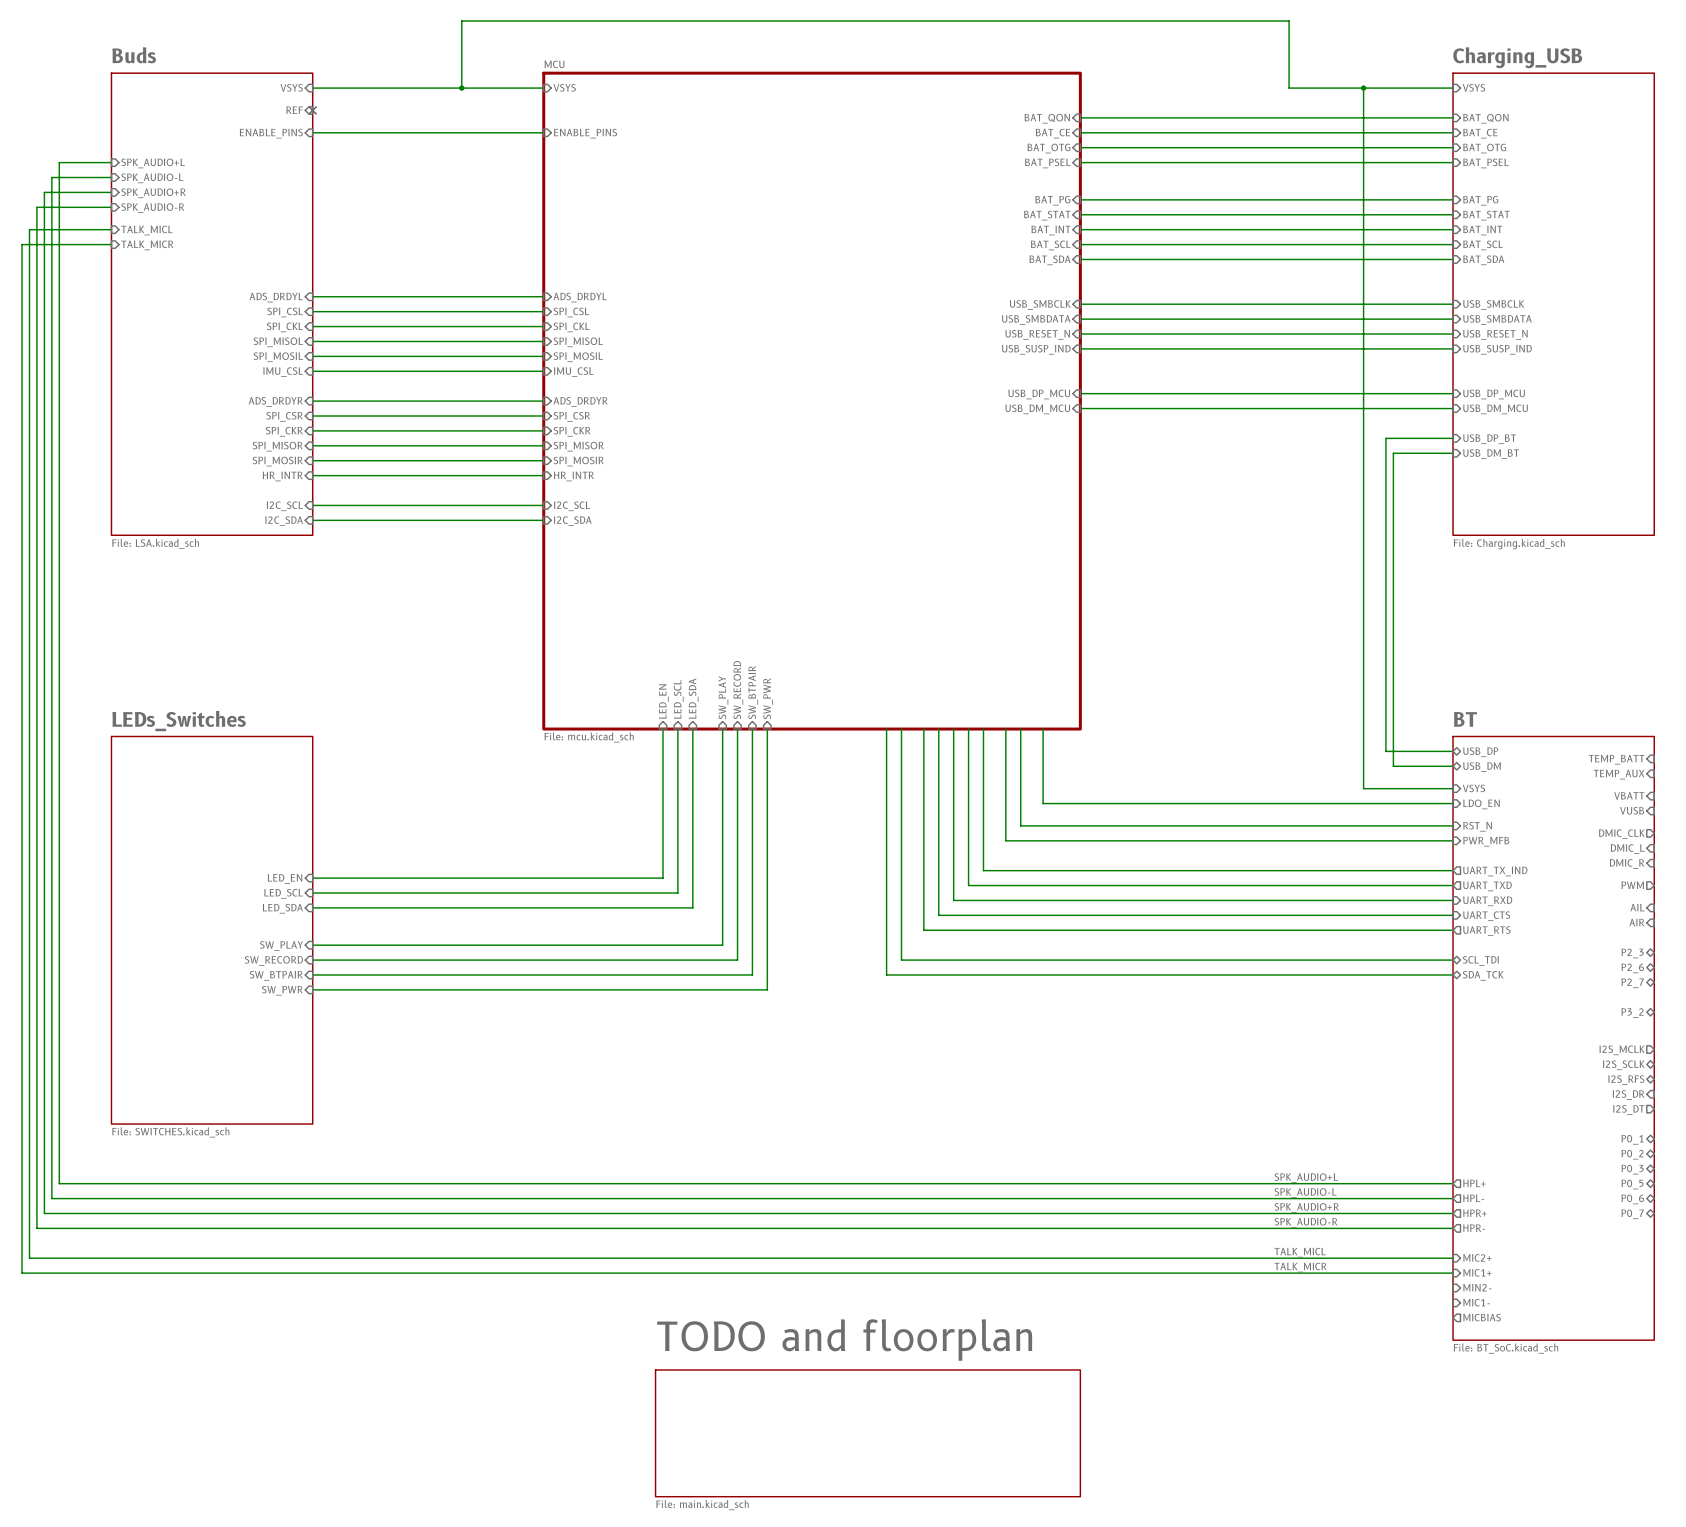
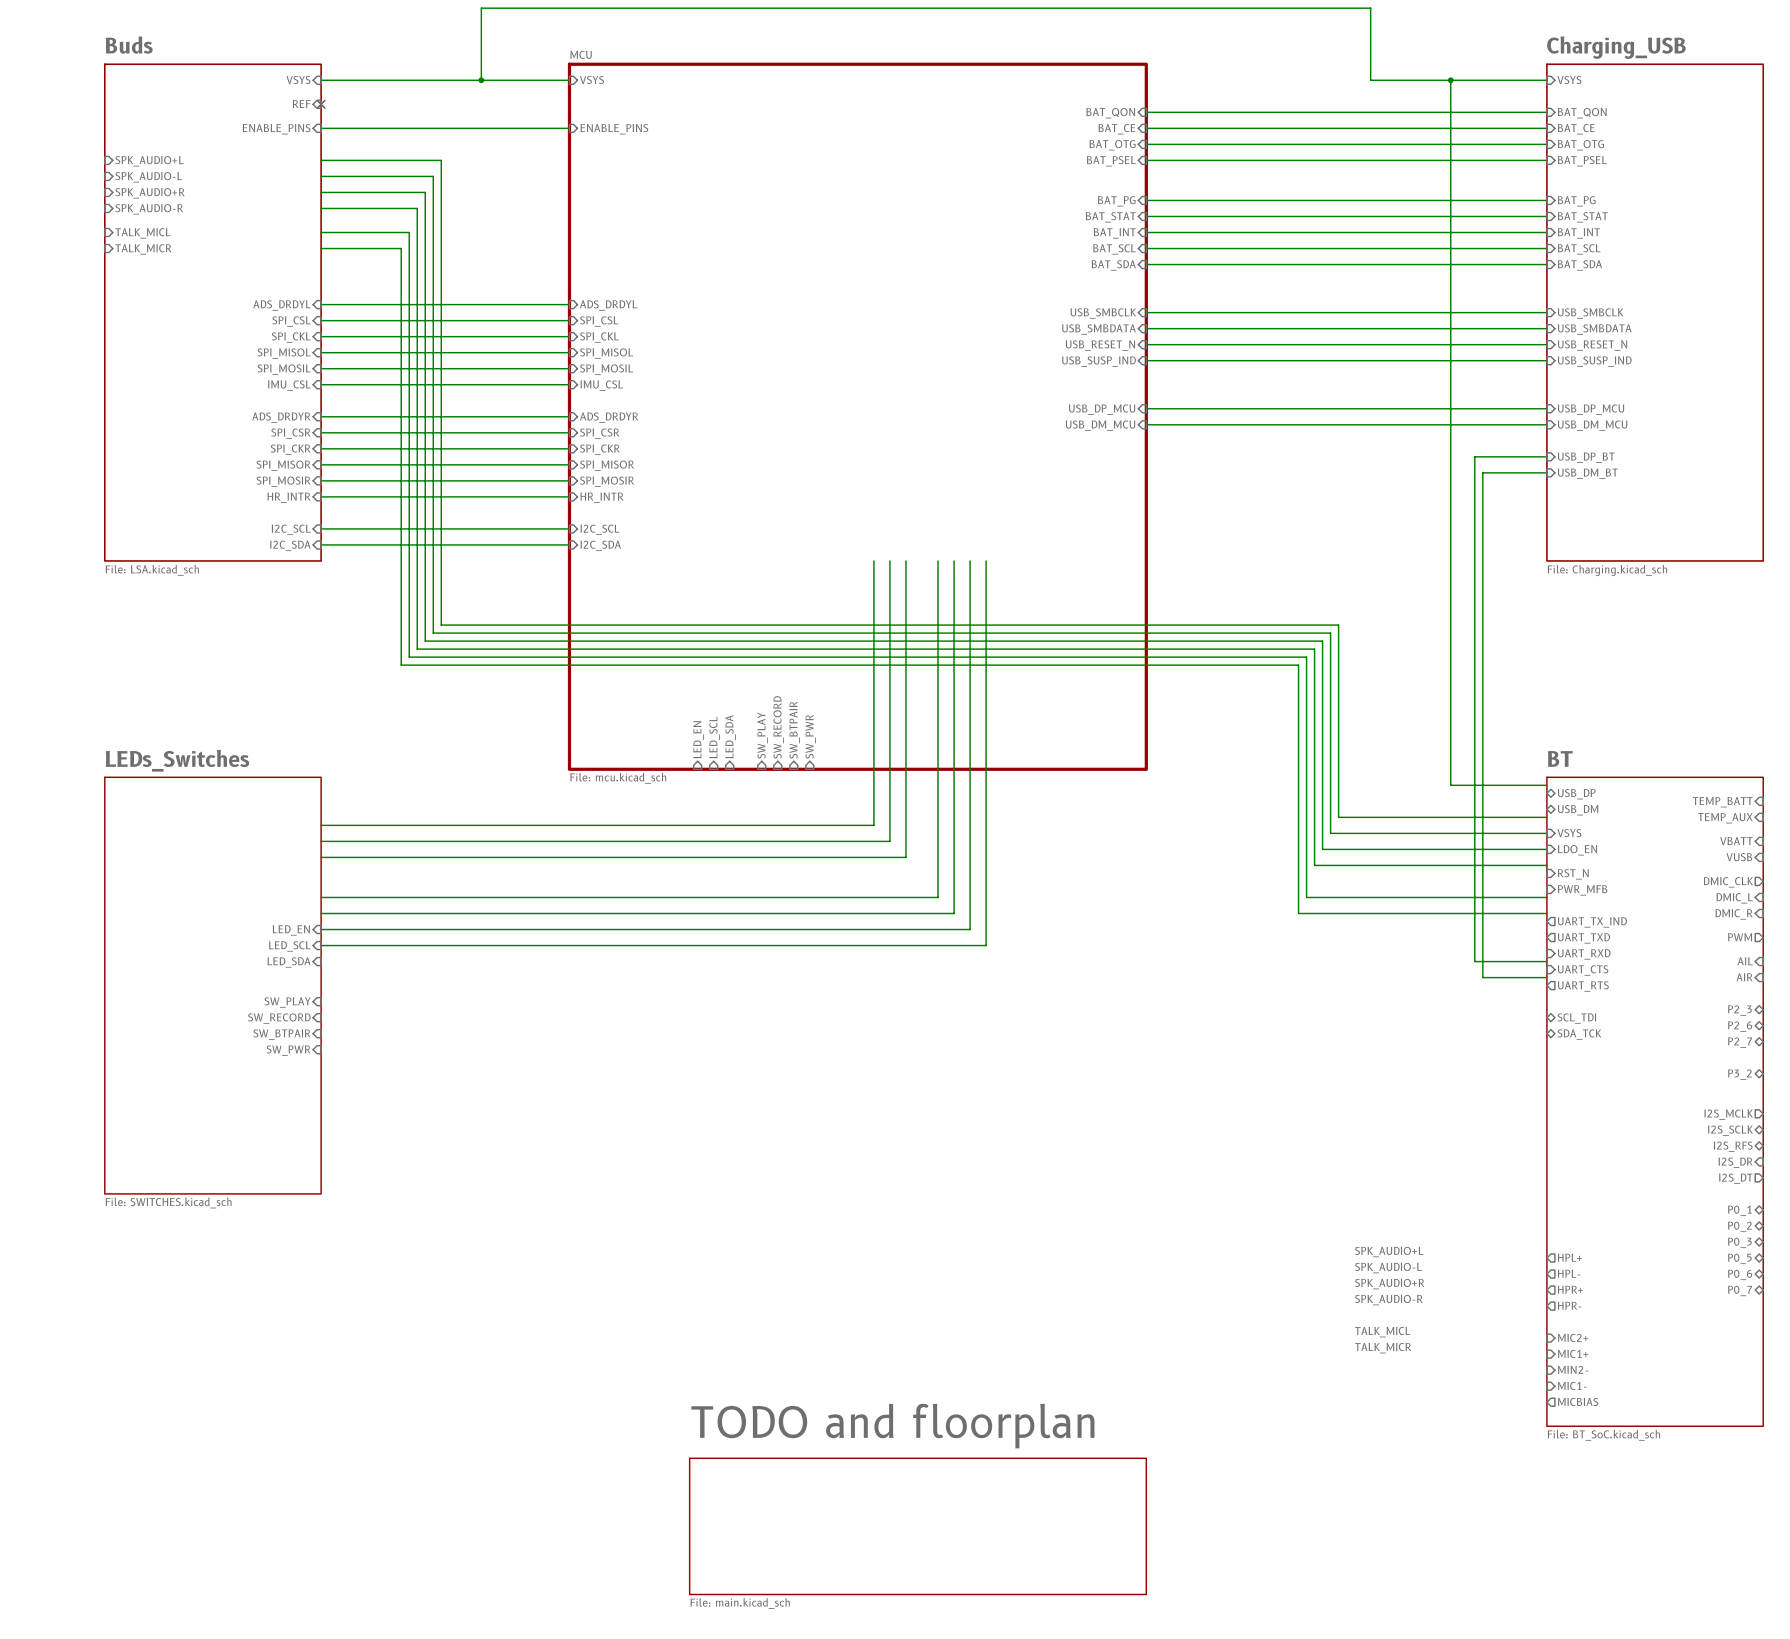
wire: (111, 162) (59, 162) (59, 1183) (1453, 1183) -> none
wire: none -> (321, 160) (441, 160) (441, 625) (1338, 625) (1338, 817) (1546, 817)
wire: (111, 177) (51, 177) (51, 1198) (1453, 1198) -> none
wire: none -> (321, 176) (433, 176) (433, 633) (1330, 633) (1330, 833) (1450, 833)
wire: (111, 192) (44, 192) (44, 1213) (1453, 1213) -> none
wire: (111, 207) (36, 207) (36, 1228) (1453, 1228) -> none
wire: none -> (321, 208) (417, 208) (417, 649) (1314, 649) (1314, 865) (1546, 865)
wire: (111, 229) (29, 229) (29, 1258) (1453, 1258) -> none
wire: none -> (321, 232) (409, 232) (409, 657) (1306, 657) (1306, 897) (1546, 897)
wire: (111, 244) (22, 244) (22, 1273) (1453, 1273) -> none
wire: none -> (321, 248) (401, 248) (401, 665) (1298, 665) (1298, 913) (1546, 913)
wire: none -> (873, 560) (873, 825) (321, 825)
wire: none -> (889, 560) (889, 841) (321, 841)
wire: none -> (905, 560) (905, 857) (321, 857)
wire: none -> (938, 560) (938, 769)
wire: none -> (954, 560) (954, 769)
wire: (663, 729) (663, 878) -> (970, 560) (970, 929) (697, 929)
wire: (677, 729) (677, 893) -> (986, 560) (986, 945) (713, 945)
wire: (692, 729) (692, 907) (312, 907) -> none
wire: (722, 729) (722, 945) (312, 945) -> none
wire: (737, 729) (737, 960) (312, 960) -> none
wire: (752, 729) (752, 974) (312, 974) -> none
wire: (767, 729) (767, 989) (312, 989) -> none
wire: (923, 729) (923, 930) (1453, 930) -> none
wire: (938, 729) (938, 915) (1453, 915) -> none
wire: (953, 729) (953, 900) (1453, 900) -> none
wire: (968, 729) (968, 885) (1453, 885) -> none
wire: (983, 729) (983, 870) (1453, 870) -> none
wire: (1005, 729) (1005, 840) (1453, 840) -> none
wire: (1020, 729) (1020, 825) (1453, 825) -> none
wire: (1043, 729) (1043, 803) (1244, 803) -> (321, 192) (425, 192) (425, 641) (1322, 641) (1322, 849)
wire: (1363, 743) (1363, 788) -> (1450, 785) (1546, 785)
wire: (1385, 751) (1453, 751) -> (1474, 793) (1474, 961) (1546, 961)
wire: (1393, 766) (1453, 766) -> (1482, 809) (1482, 977) (1546, 977)
wire: (886, 848) (886, 974) (1453, 974) -> (938, 897) (321, 897)
wire: (901, 863) (901, 960) (1453, 960) -> (954, 913) (321, 913)

